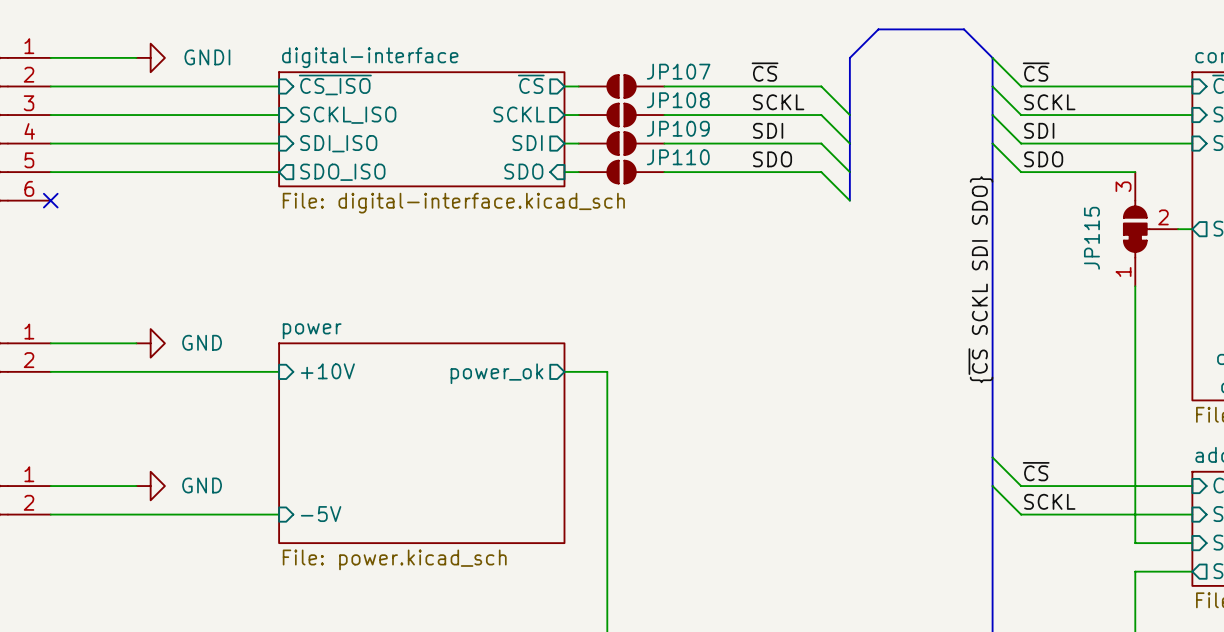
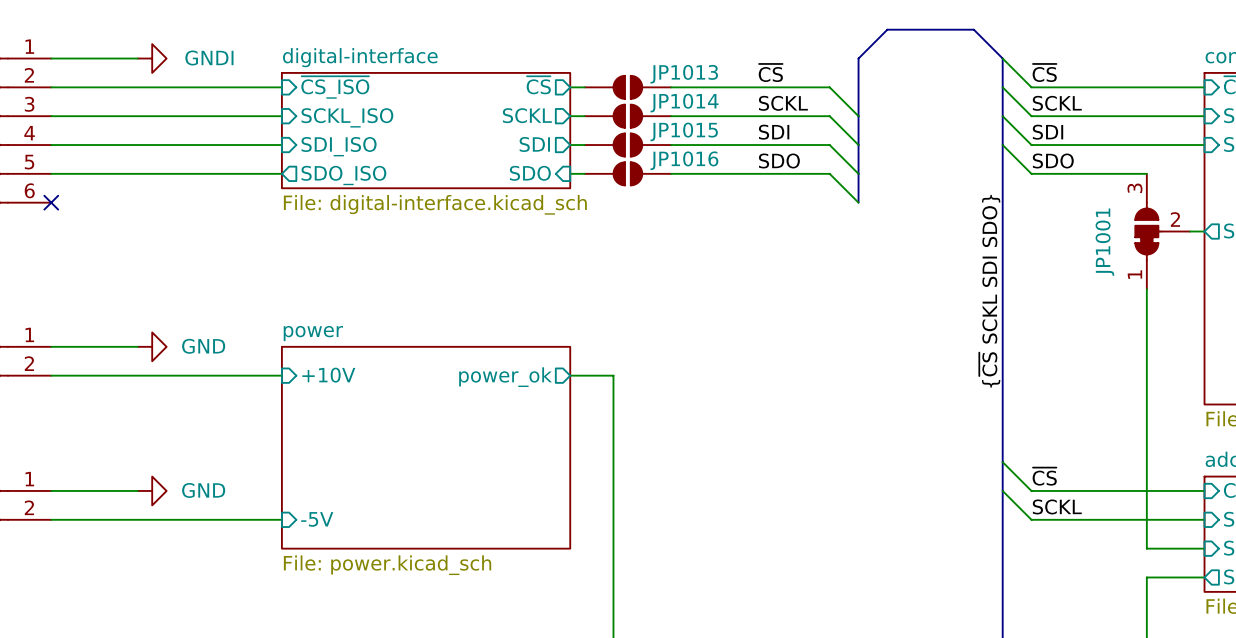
JP107 name: JP107 (678, 71) -> JP1013 (684, 74)
JP108 name: JP108 (678, 100) -> JP1014 (684, 103)
JP109 name: JP109 (678, 128) -> JP1015 (684, 131)
JP110 name: JP110 (678, 157) -> JP1016 (684, 160)
JP115 name: JP115 (1091, 238) -> JP1001 (1104, 242)

